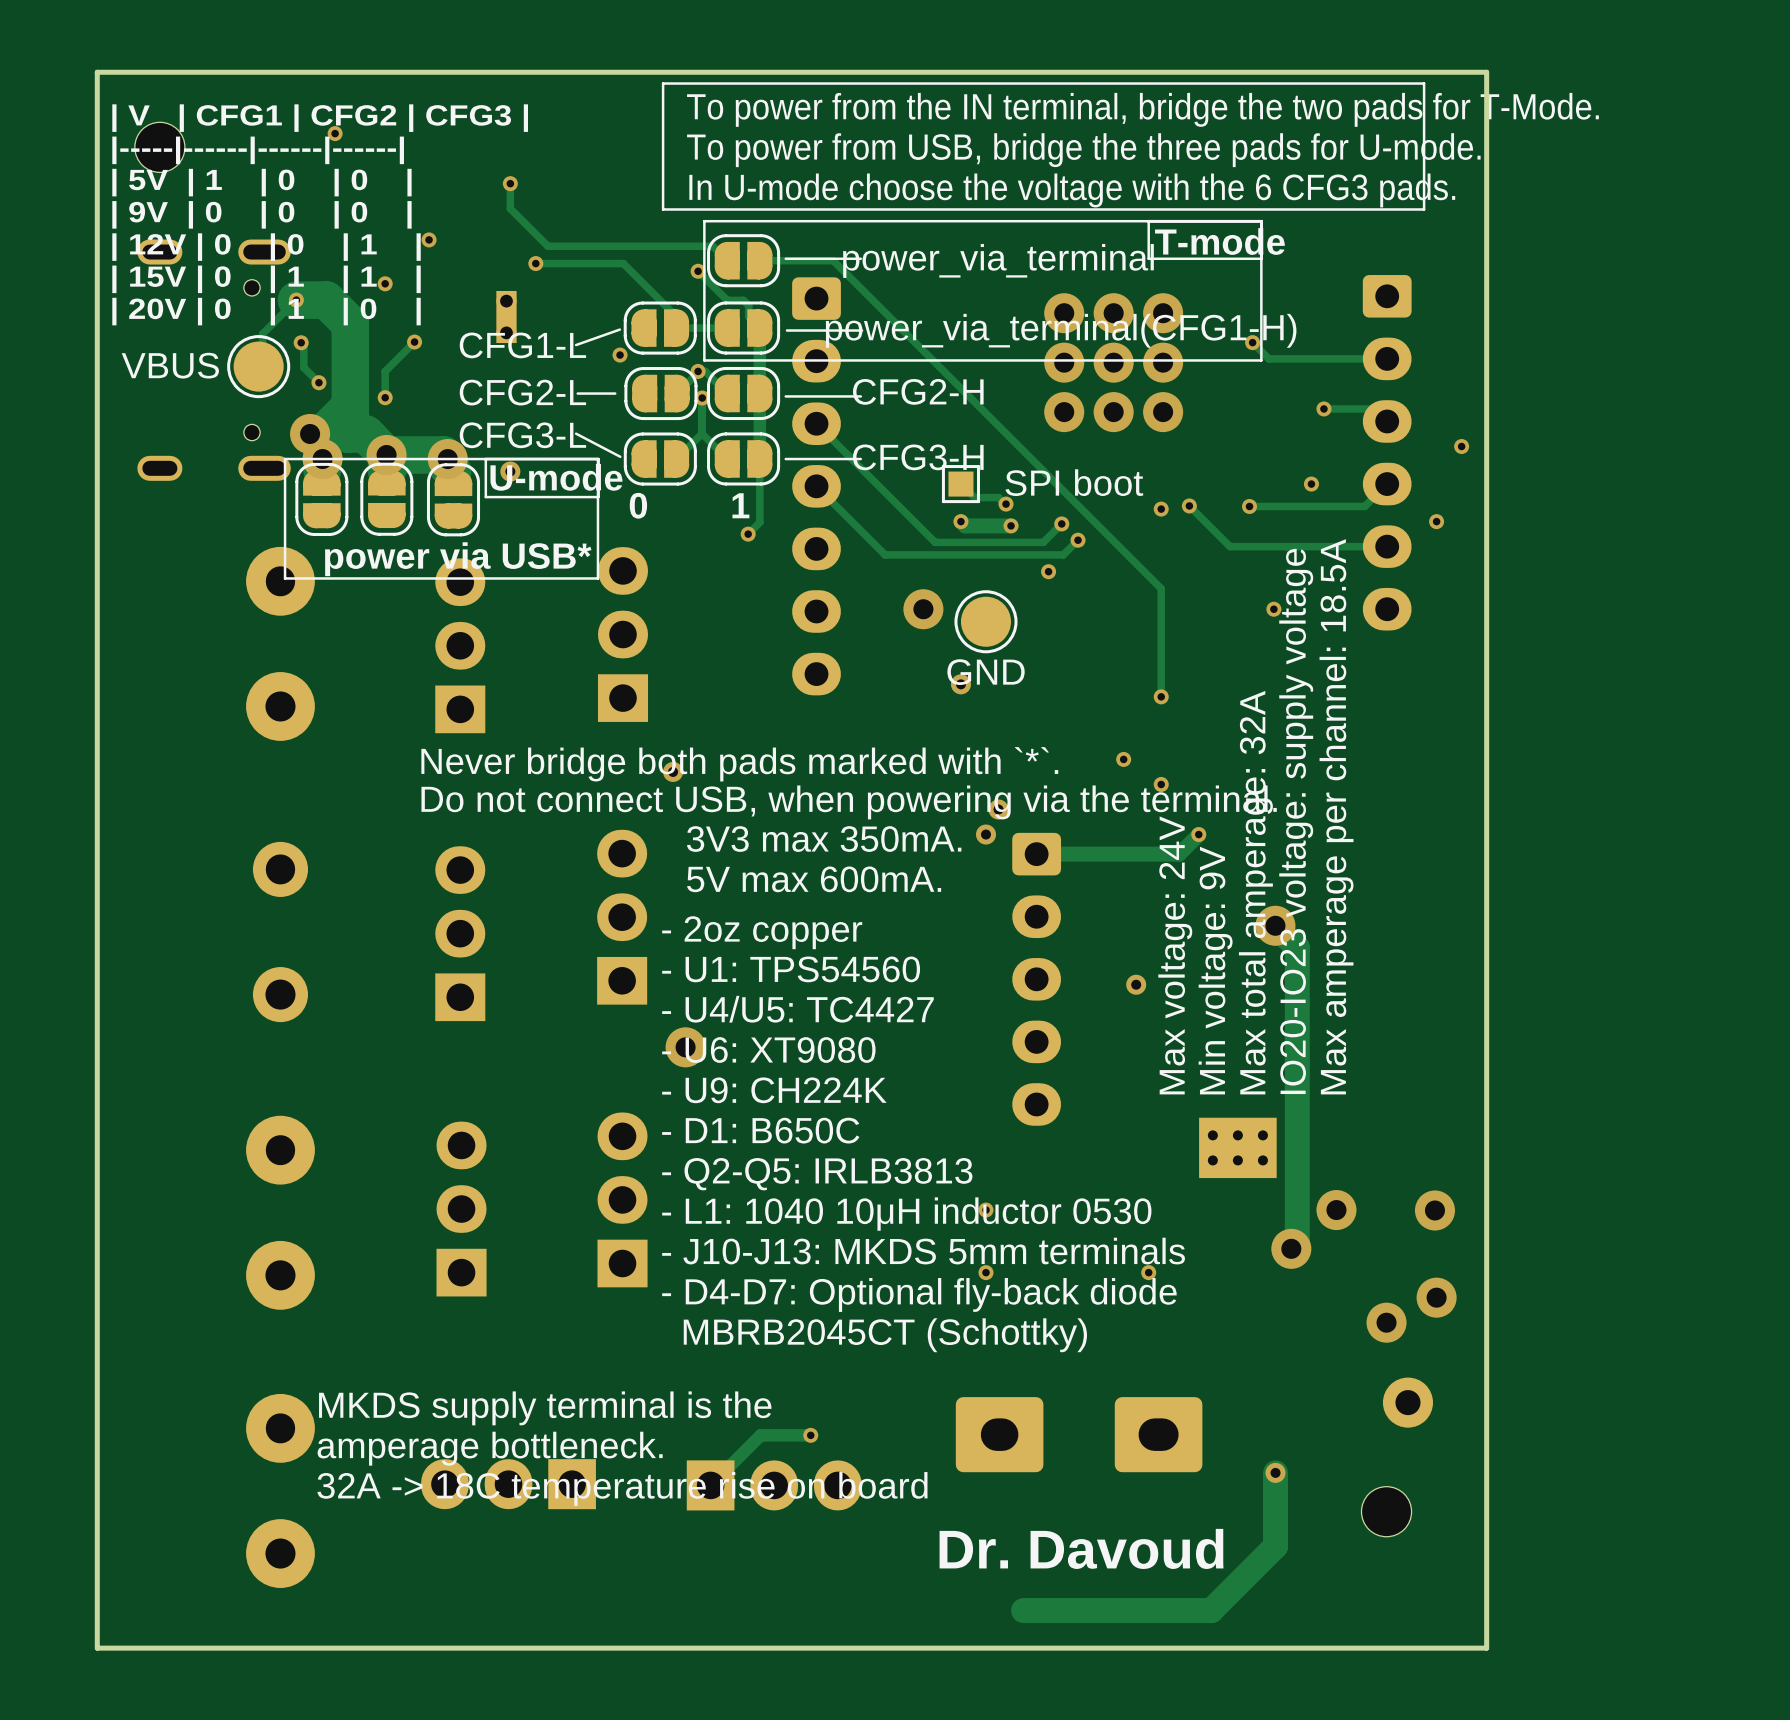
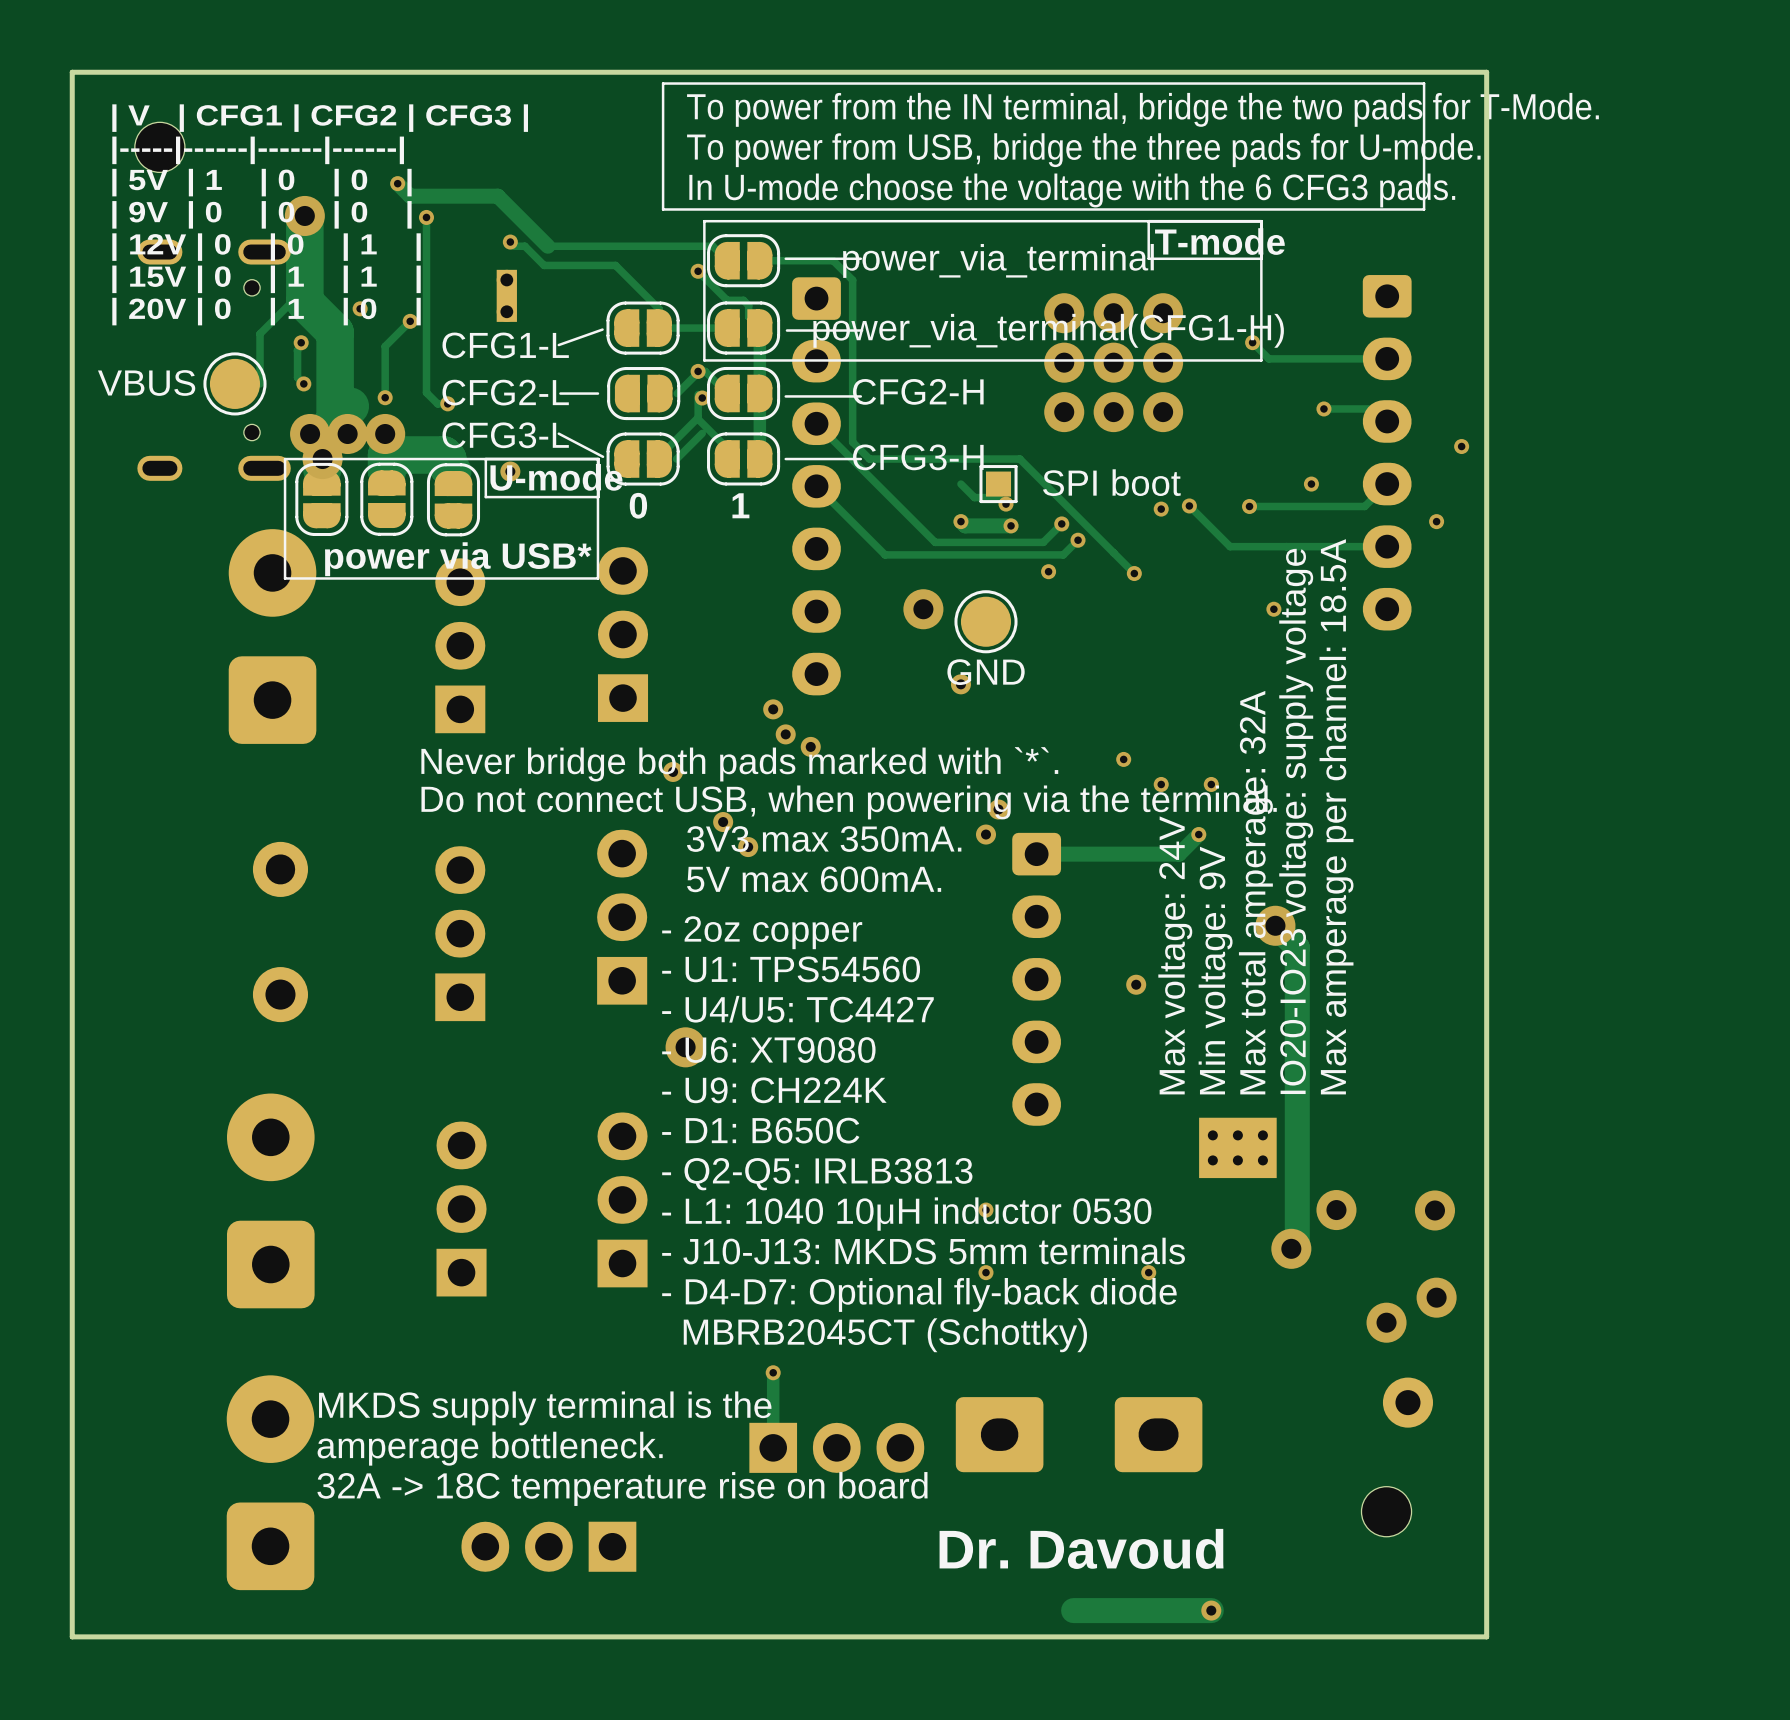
board edge: (97, 72) (97, 1648) (1486, 1648) (1486, 1636) -> (97, 72) (72, 72) (72, 1636) (1486, 1636)
via: (335, 133) -> none
via: none -> (397, 183)
track: (510, 183) (510, 208) -> (397, 183) (410, 196) (497, 196) (510, 208)
via: (510, 183) -> none
track width: thin (510, 208) (547, 246) -> thick (510, 208) (547, 246)
track: none -> (304, 215) (304, 302) (335, 332) (335, 421) (347, 434)
via: none -> (304, 215)
track: none -> (426, 217) (426, 392) (437, 403) (447, 403)
via position: (429, 239) -> (426, 217)
via: none -> (510, 242)
track: (535, 263) (623, 263) (676, 316) (676, 328) -> (510, 242) (514, 246) (524, 246) (544, 265) (615, 265) (659, 309) (659, 328) (676, 328)
via: (535, 263) -> none
track: (852, 280) (1161, 588) (1161, 696) -> (852, 280) (852, 442) (869, 459) (1019, 459) (1134, 573)
via: (385, 283) -> none
track: none -> (304, 289) (260, 333) (260, 383)
via: (296, 300) -> none
via: none -> (360, 308)
part position: (506, 317) -> (506, 295)
part position: (660, 328) -> (643, 328)
line: (619, 329) (576, 345) -> (602, 329) (558, 345)
part value position: power_via_terminal(CFG1-H) (1061, 330) -> power_via_terminal(CFG1-H) (1048, 330)
track: (301, 342) (303, 345) (303, 367) (318, 382) -> none
track: (414, 342) (385, 371) -> (410, 321) (385, 346) (385, 371)
via position: (414, 342) -> (410, 321)
track: none -> (297, 350) (297, 377) (303, 383)
via: (620, 355) -> none
track: (258, 366) (262, 362) (262, 333) (296, 300) (326, 300) (350, 324) (350, 431) (347, 434) (365, 434) (386, 454) -> none
part position: (258, 366) -> (234, 383)
via position: (318, 382) -> (303, 383)
line: (615, 393) (597, 393) -> (577, 393) (560, 393)
part position: (660, 393) -> (643, 393)
track: none -> (698, 394) (698, 419) (727, 448)
track: (702, 398) (702, 433) (727, 458) -> none
via: none -> (447, 403)
track: none -> (698, 417) (659, 456)
line: (576, 433) (620, 456) -> (558, 433) (603, 456)
via: none -> (347, 434)
via position: (386, 454) -> (385, 434)
track: (759, 458) (759, 522) (748, 534) -> none
via: (447, 459) -> none
part position: (660, 459) -> (643, 459)
part position: (960, 484) -> (998, 484)
via: (748, 534) -> none
part footprint: [246, 546, 315, 741] -> [228, 529, 317, 744]
via: none -> (1134, 573)
via: (1161, 696) -> none
via: none -> (773, 709)
via: none -> (785, 734)
via: none -> (810, 746)
via: none -> (1211, 784)
via: none -> (723, 822)
via: none -> (748, 847)
part footprint: [246, 1115, 315, 1310] -> [226, 1093, 315, 1309]
track: none -> (773, 1372) (773, 1447)
part footprint: [246, 1393, 315, 1588] -> [226, 1375, 315, 1591]
track: (810, 1435) (760, 1435) (710, 1485) -> none
via position: (810, 1435) -> (773, 1372)
track: (1275, 1472) (1275, 1546) (1211, 1610) -> none
via: (1275, 1472) -> none
part position: (508, 1484) -> (548, 1546)
part position: (774, 1485) -> (836, 1447)
track: (1073, 1610) (1023, 1610) -> none
via: none -> (1211, 1610)

